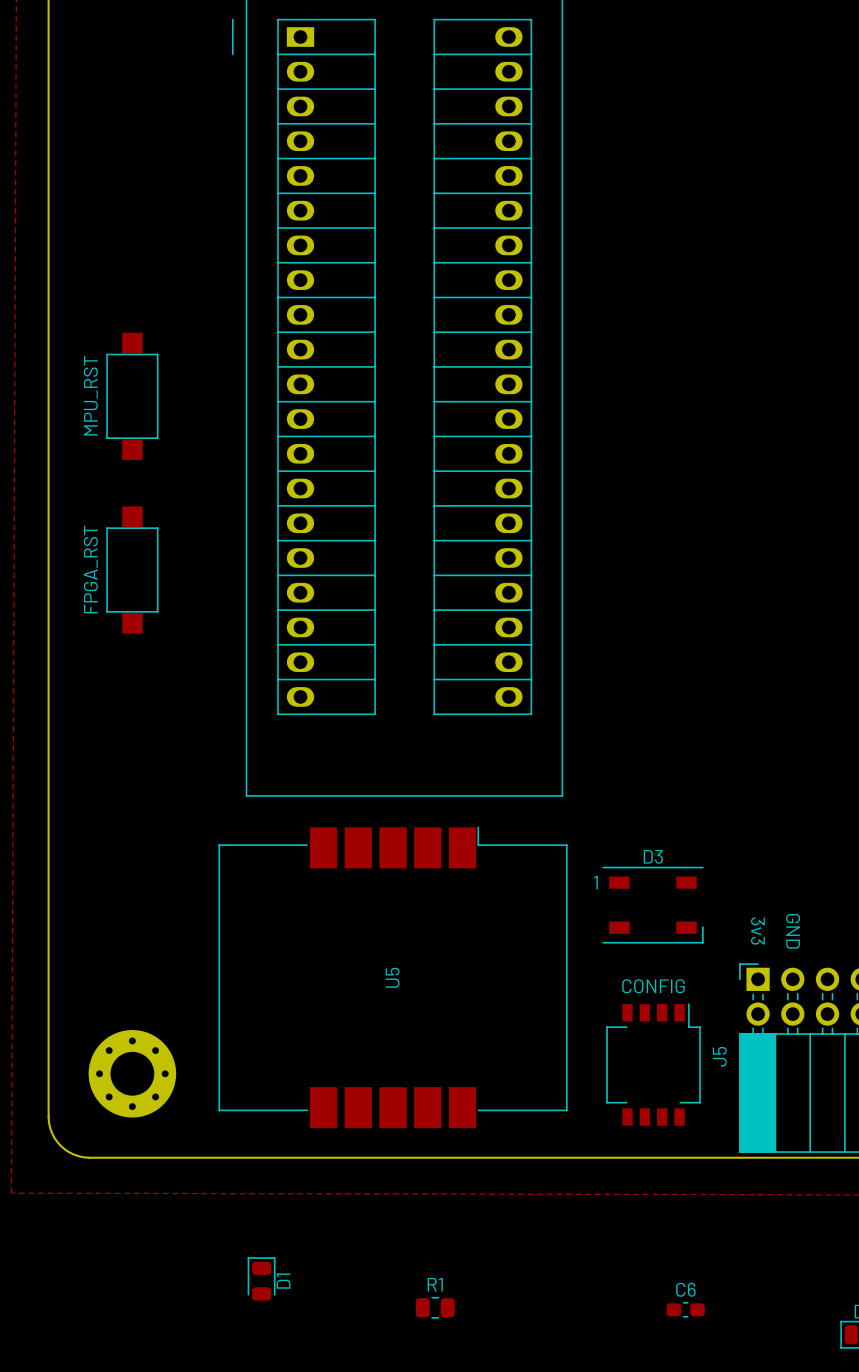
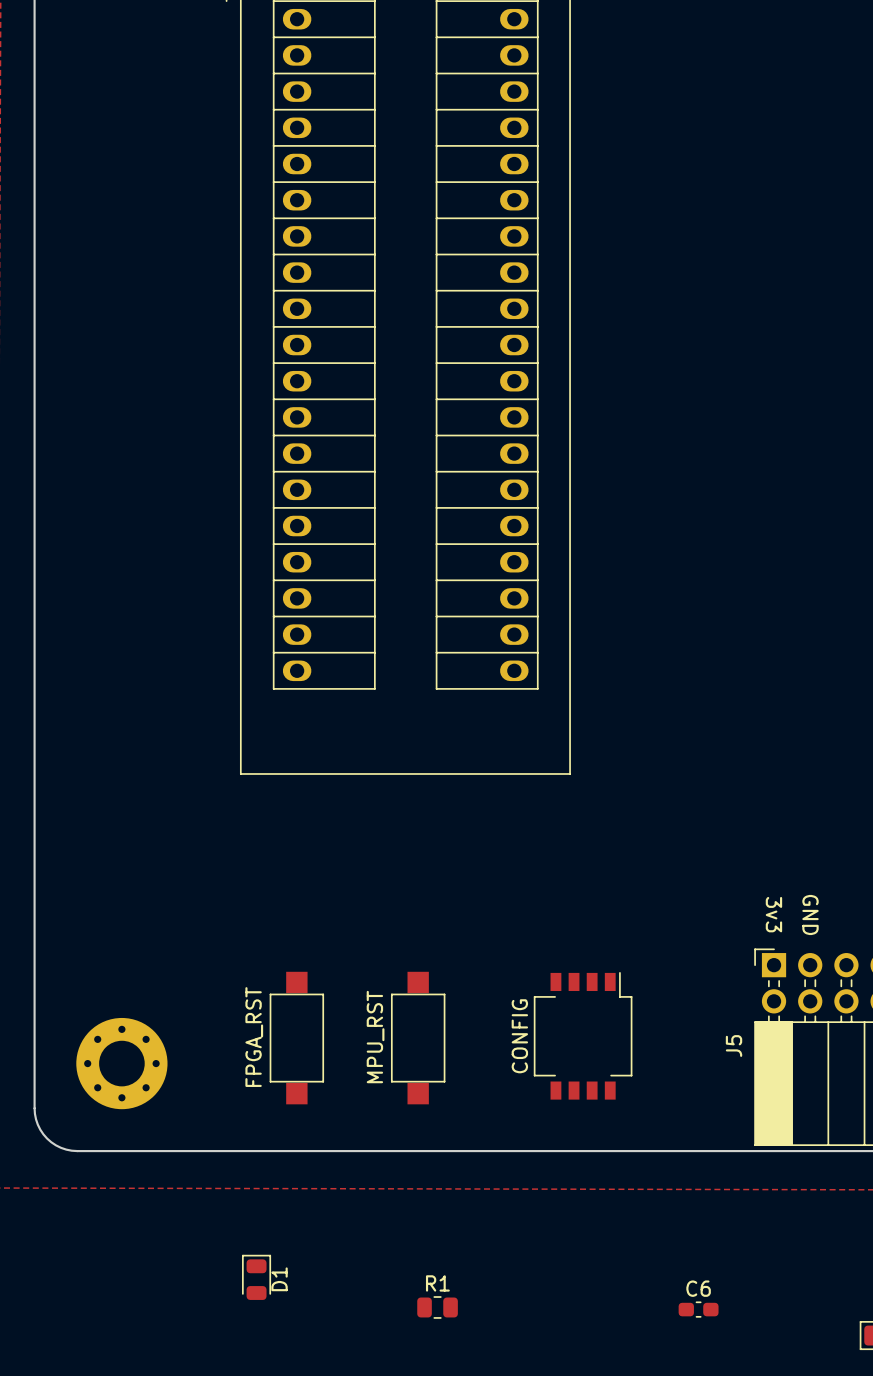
part: MPU_RST (132, 396) -> none
part: FPGA_RST (132, 569) -> none
D3: (653, 905) -> none
U5: (393, 977) -> none
part value rotation: 0° (653, 986) -> 90° counterclockwise (519, 1036)
part value position: CONFIG (653, 986) -> CONFIG (519, 1036)
part: none -> FPGA_RST (296, 1038)
part: none -> MPU_RST (418, 1038)
part position: (653, 1064) -> (583, 1035)

